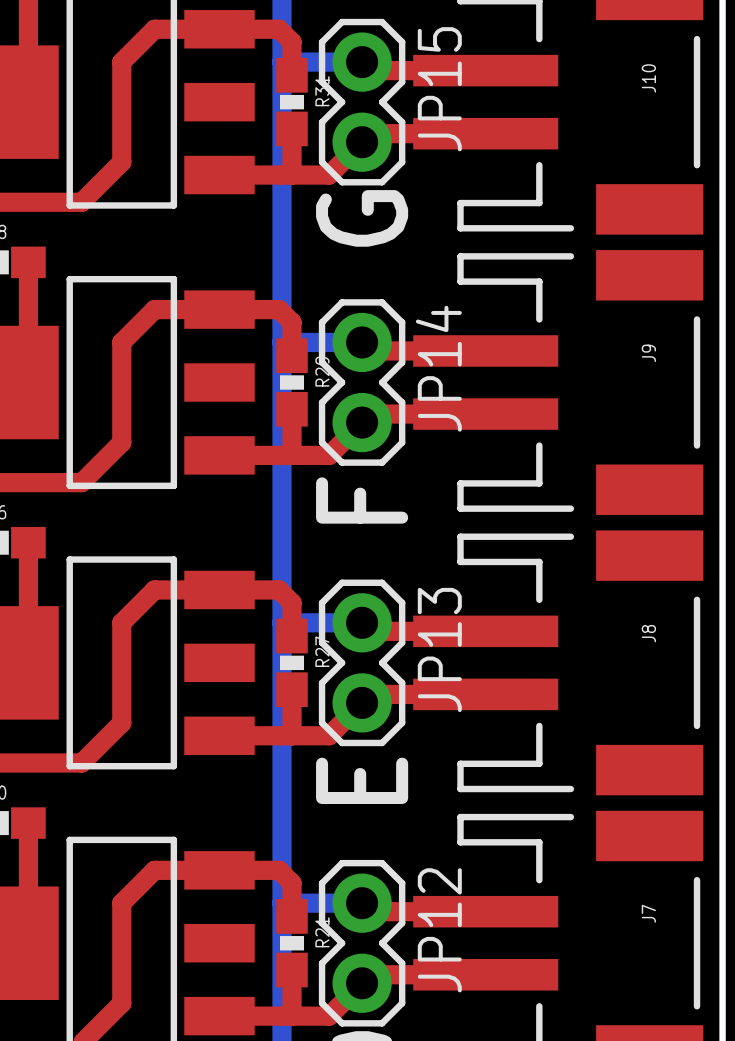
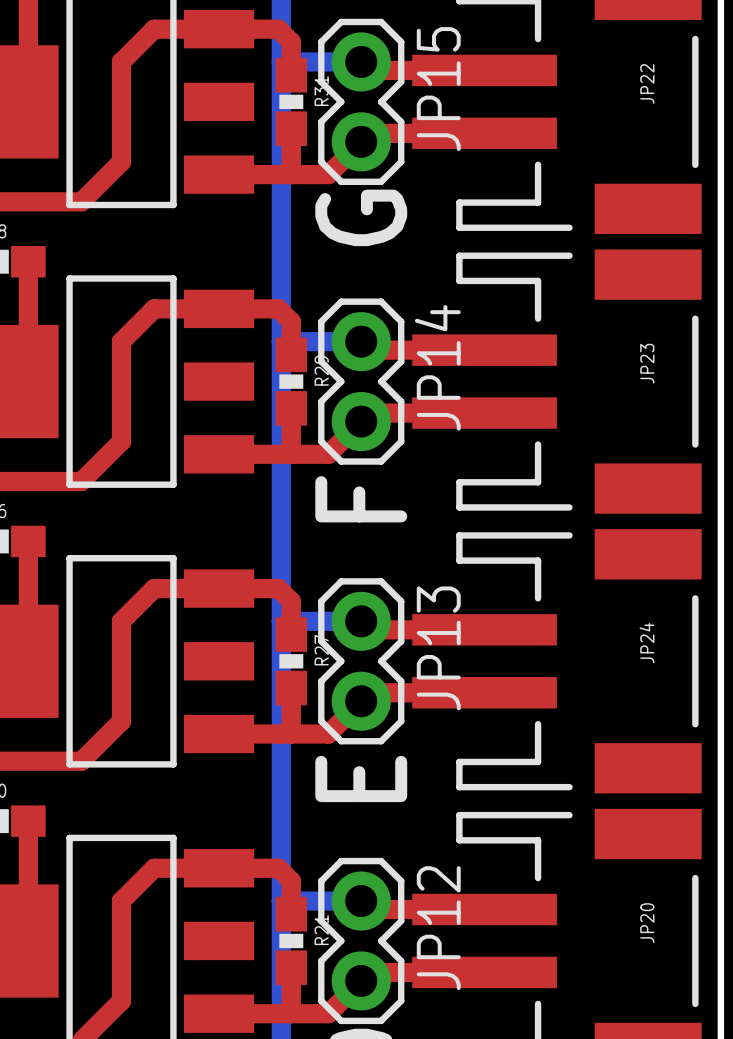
J10 name: J10 (648, 78) -> JP22 (647, 83)
J9 name: J9 (648, 353) -> JP23 (647, 363)
J8 name: J8 (648, 633) -> JP24 (647, 643)
J7 name: J7 (648, 913) -> JP20 (647, 923)

